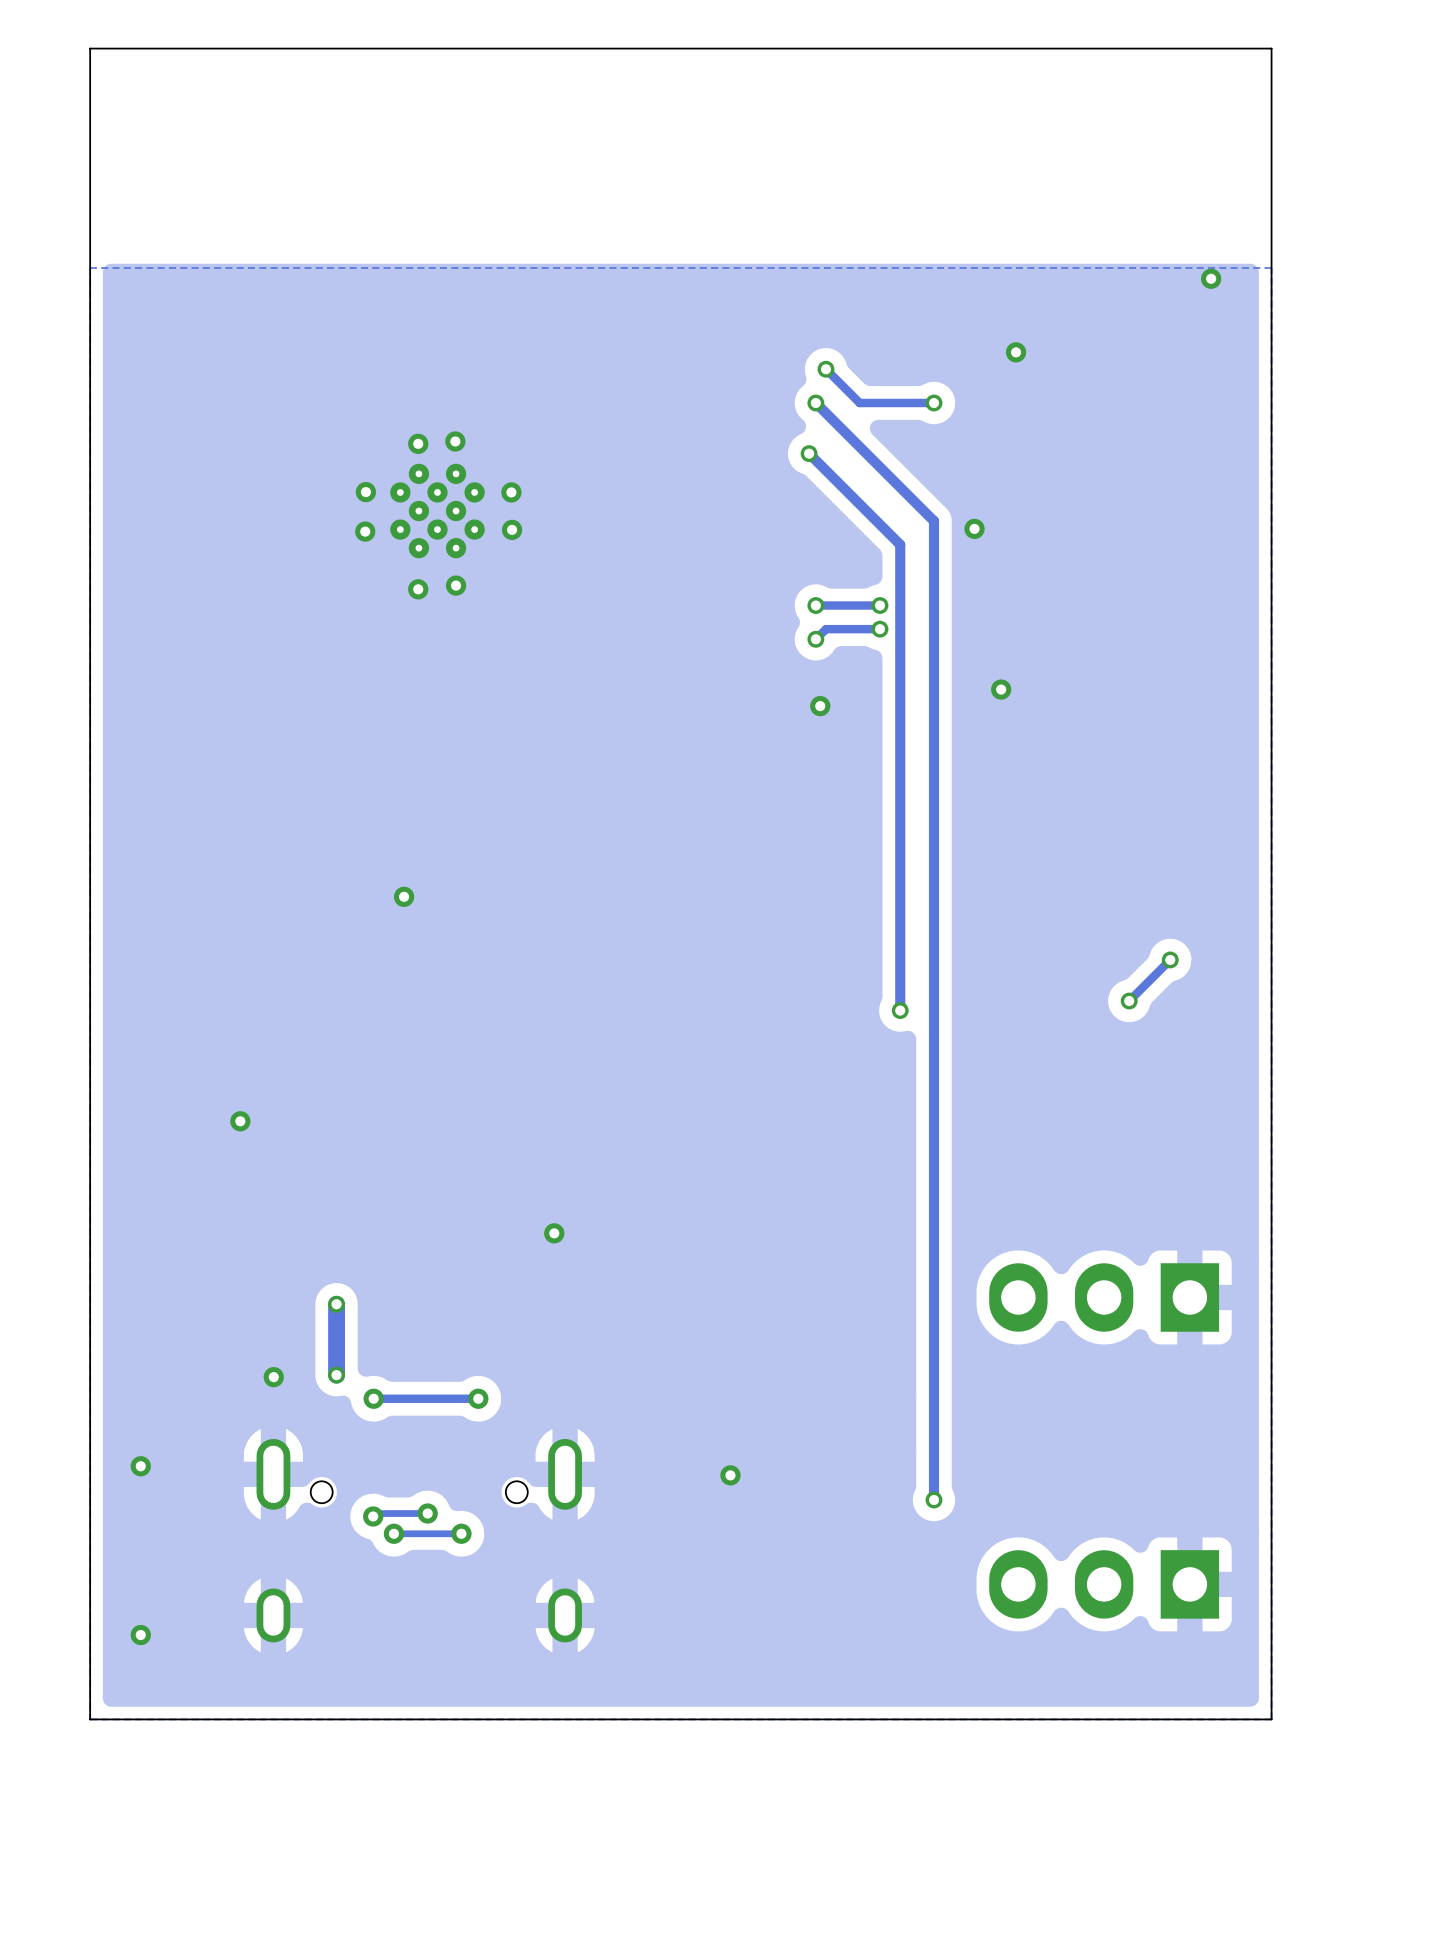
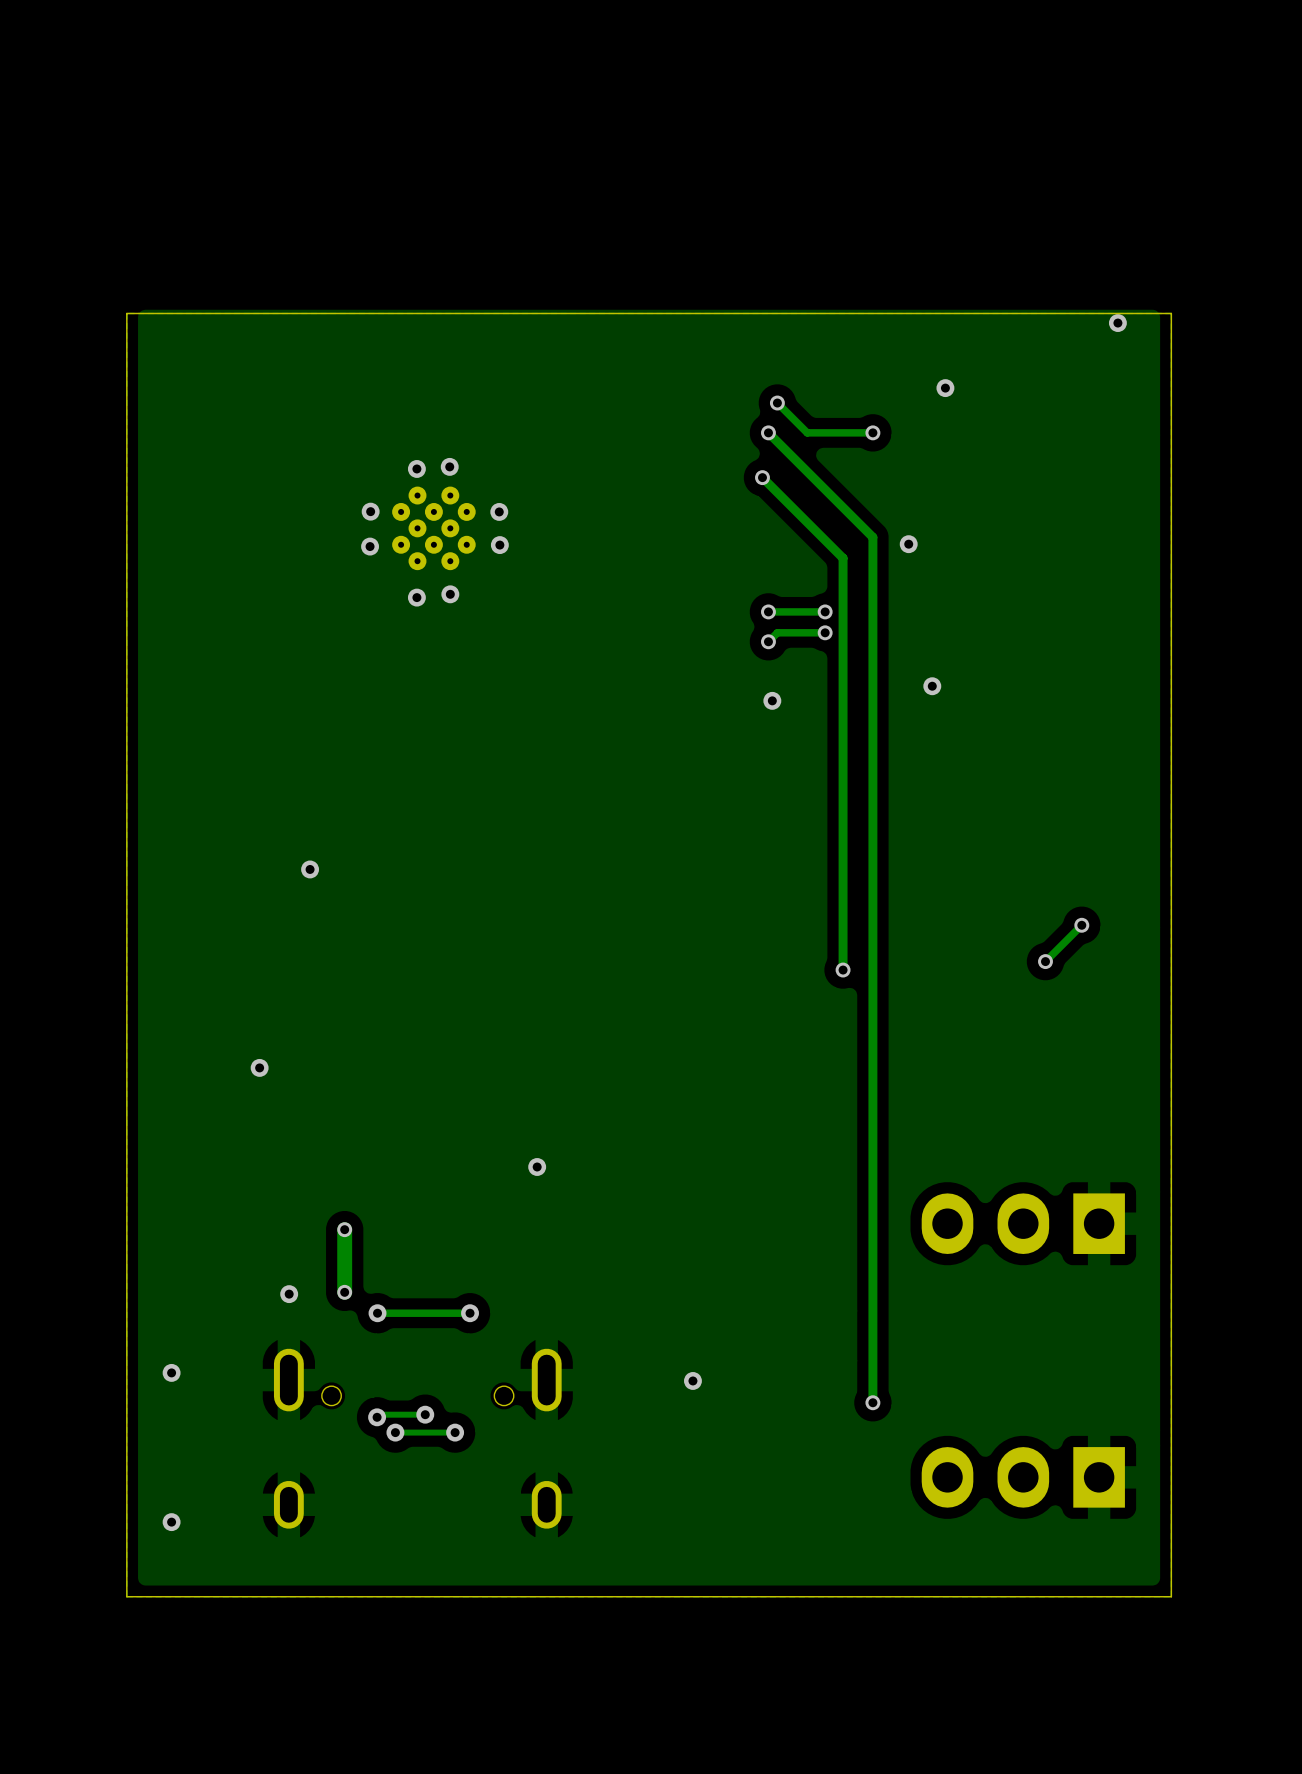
board edge: (1271, 267) (1271, 48) (90, 48) (90, 267) -> (1171, 313) (126, 313)
via position: (404, 896) -> (310, 869)

